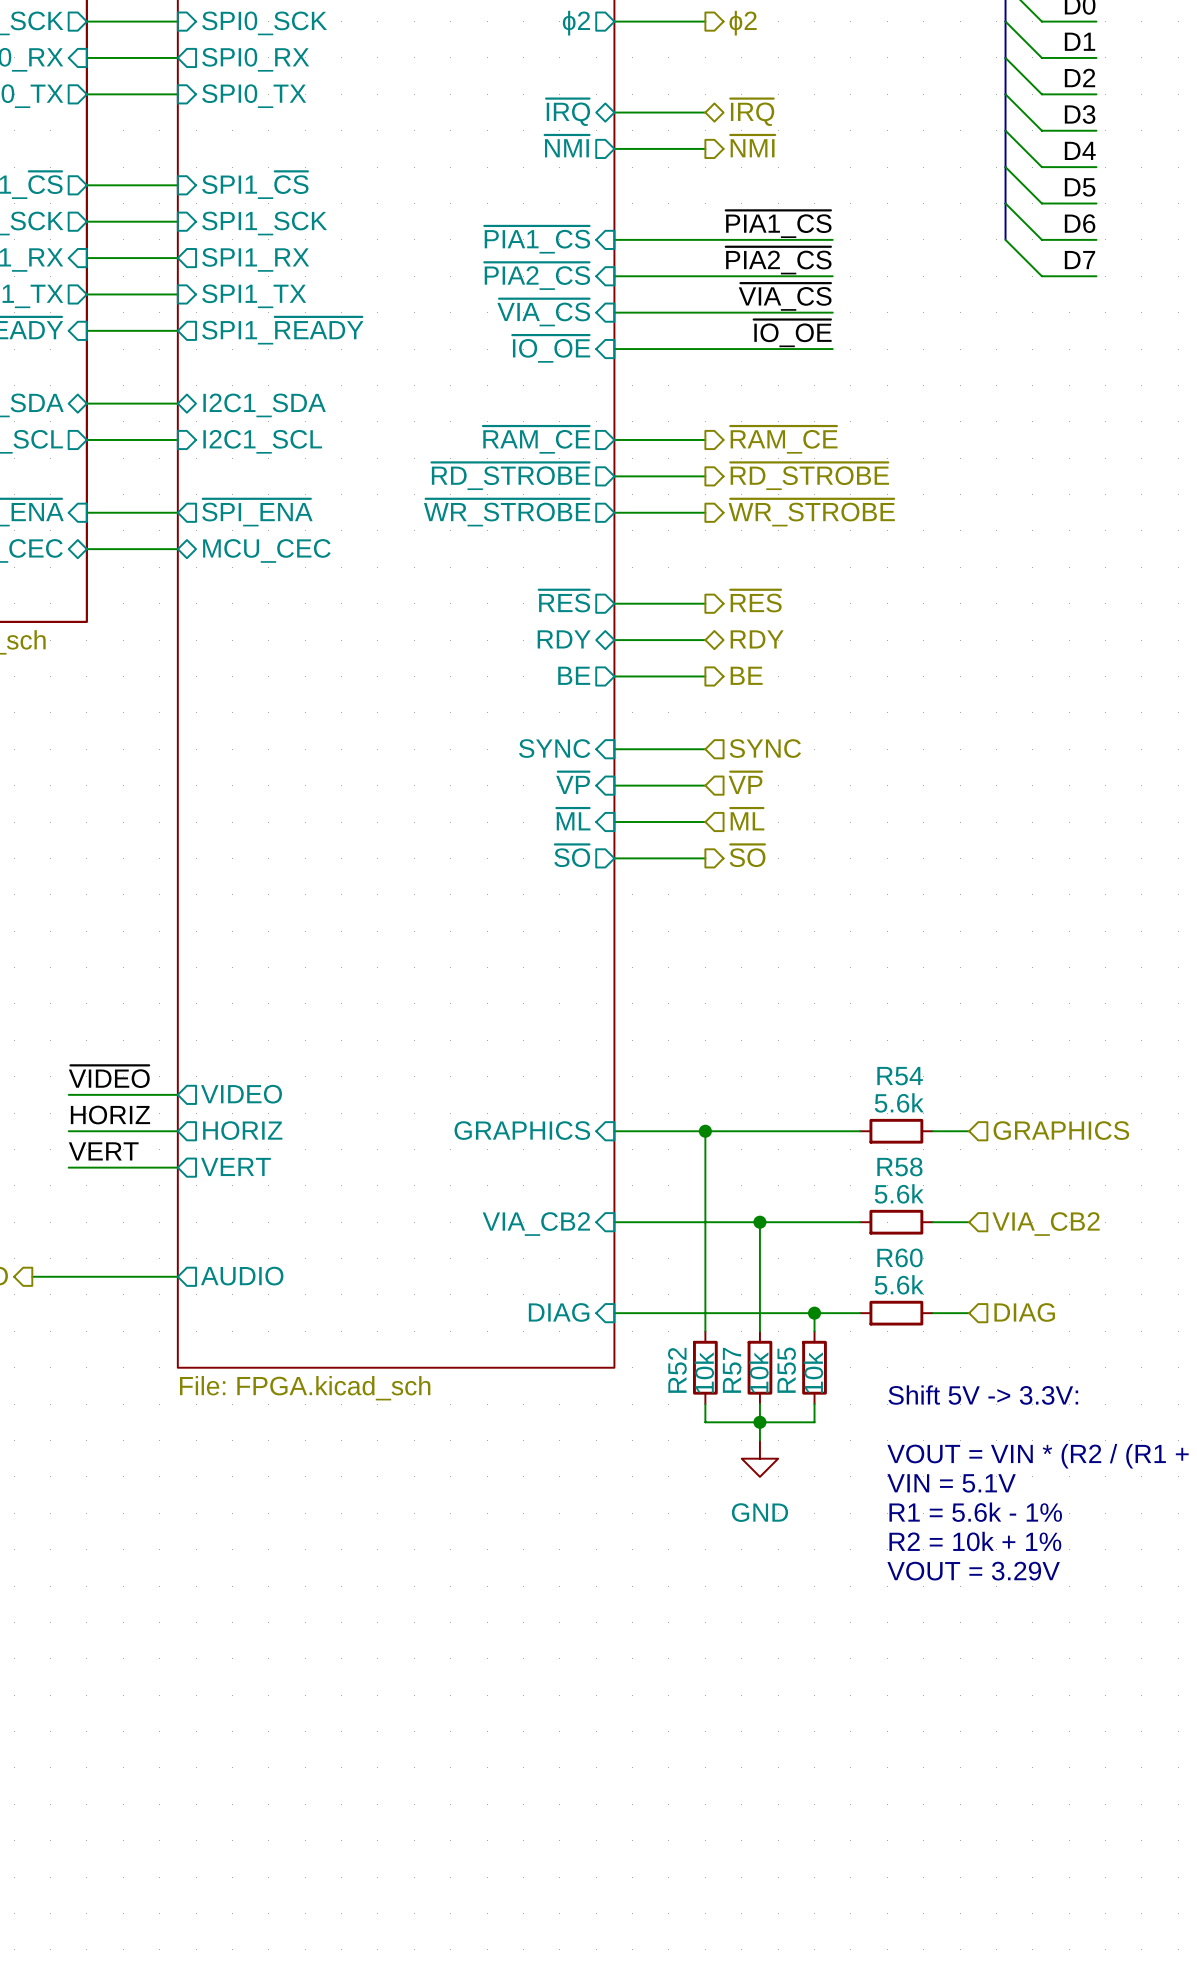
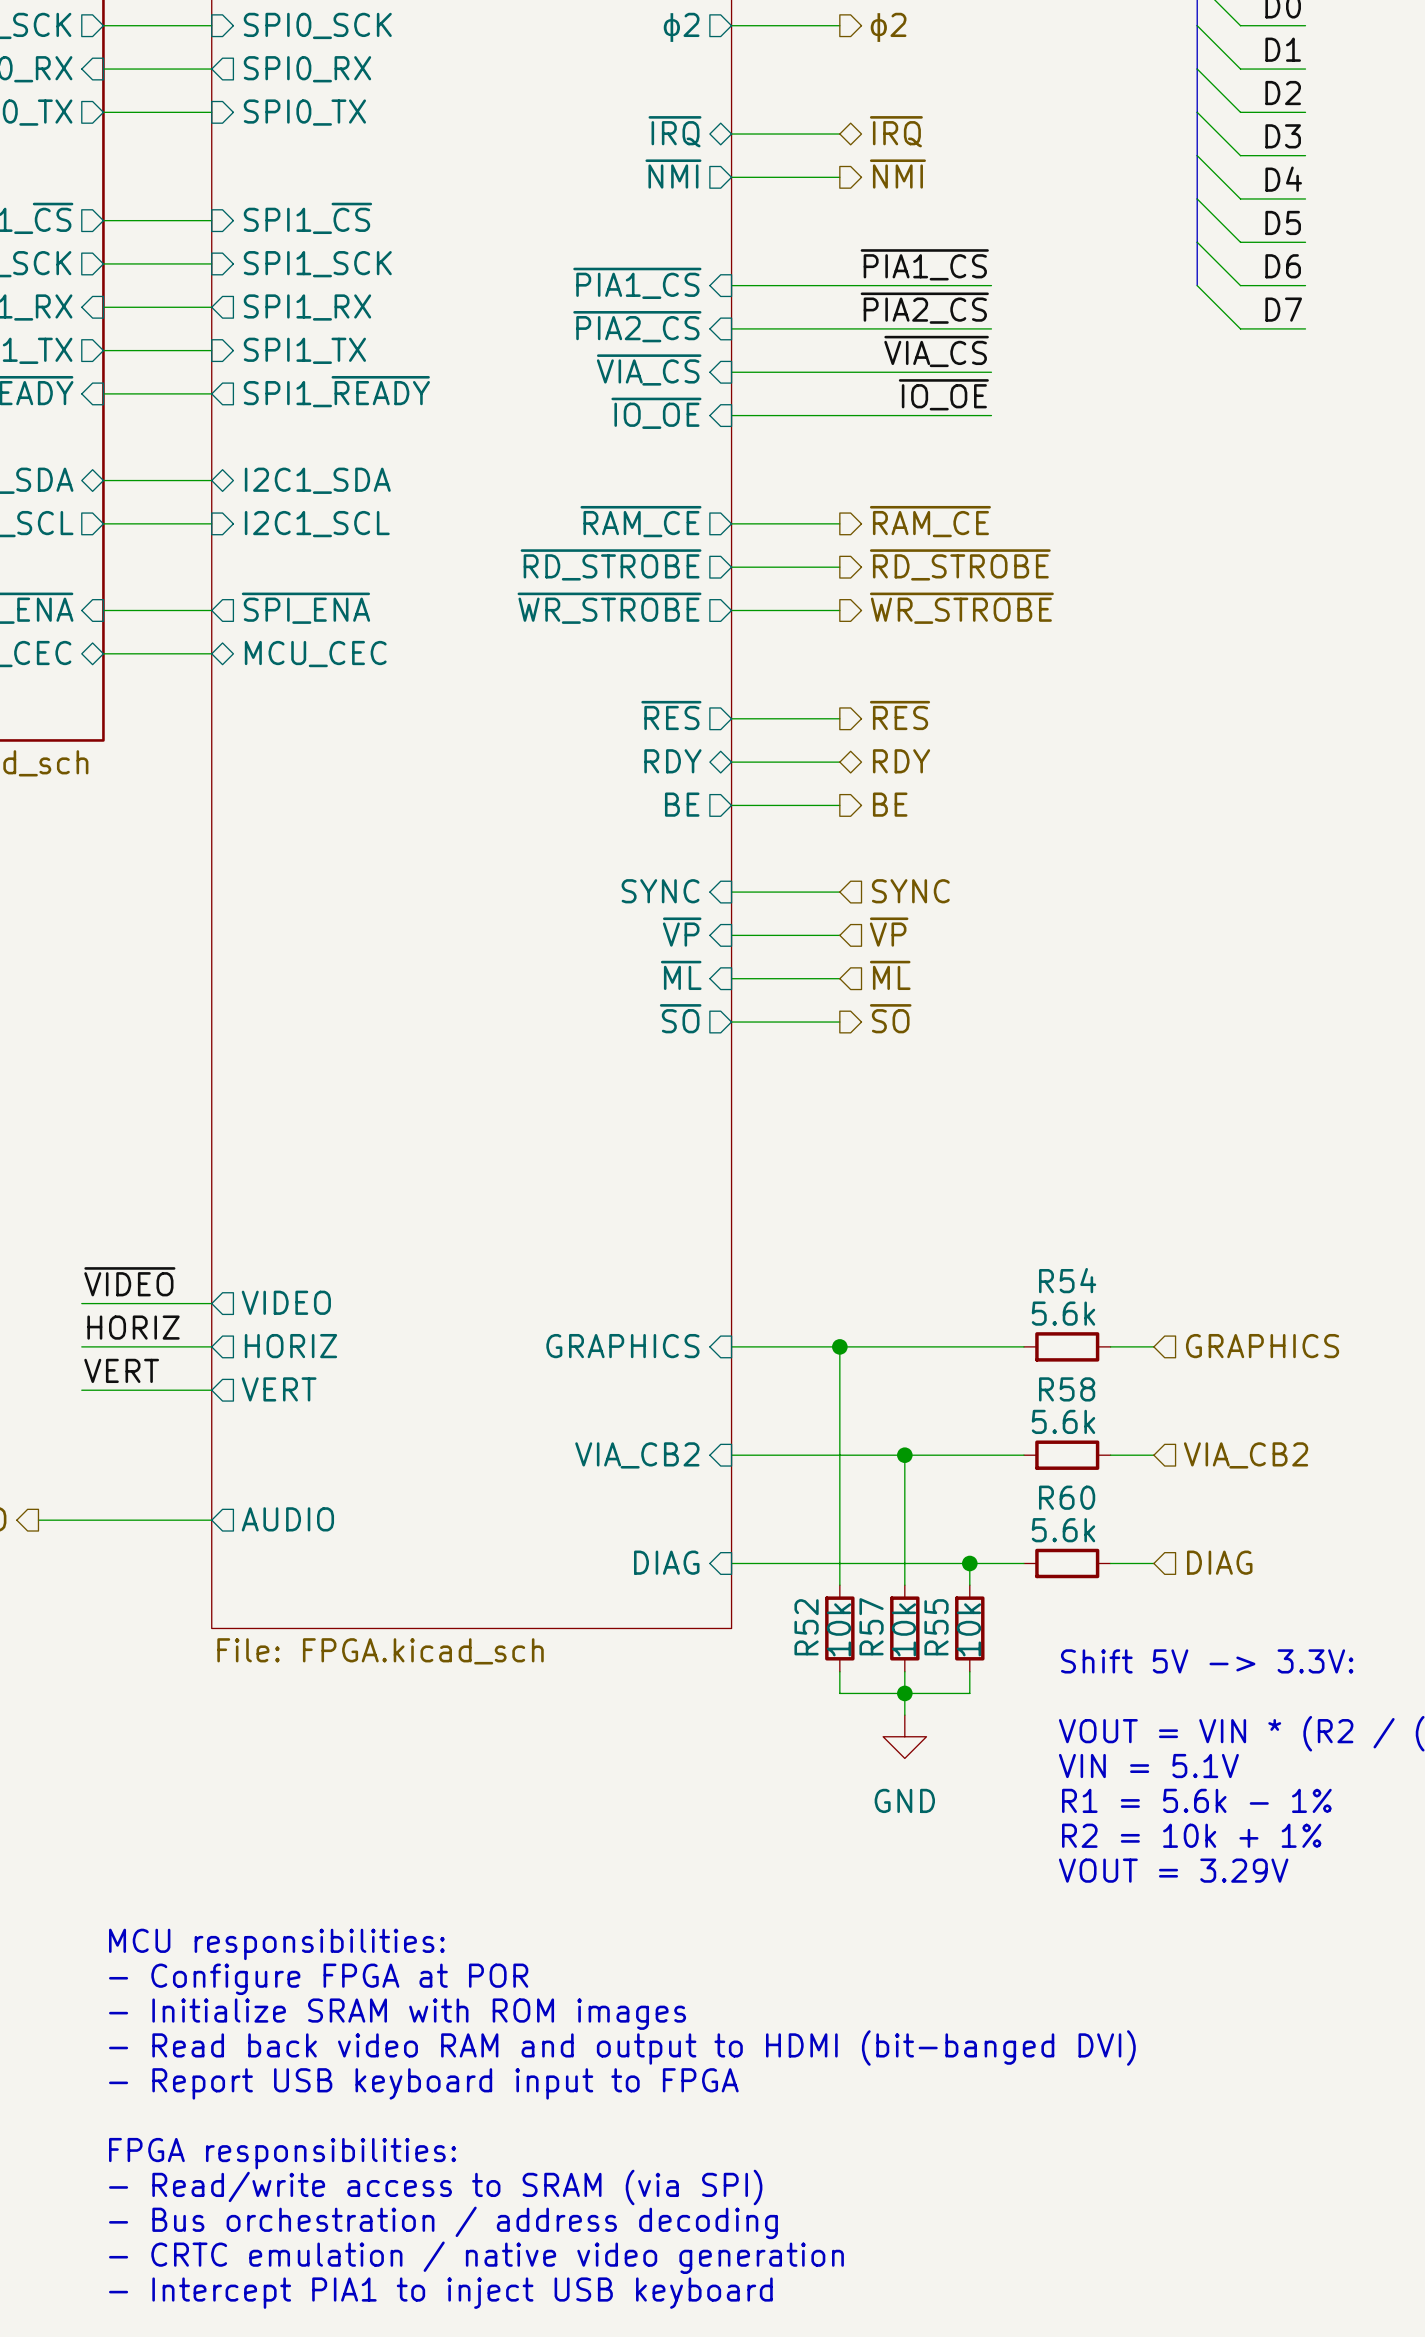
text: none -> MCU responsibilities: (276, 1944)
text: none -> - Configure FPGA at POR (318, 1979)
text: none -> - Initialize SRAM with ROM images (397, 2014)
text: none -> - Read back video RAM and output to HDMI (bit-banged DVI) (622, 2047)
text: none -> - Report USB keyboard input to FPGA (423, 2083)
text: none -> FPGA responsibilities: (282, 2153)
text: none -> - Read/write access to SRAM (via SPI) (435, 2187)
text: none -> - Bus orchestration / address decoding (443, 2222)
text: none -> - CRTC emulation / native video generation (476, 2257)
text: none -> - Intercept PIA1 to inject USB keyboard (440, 2293)

